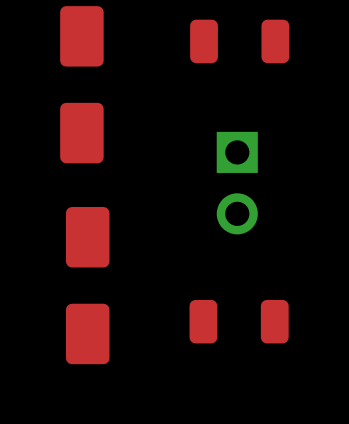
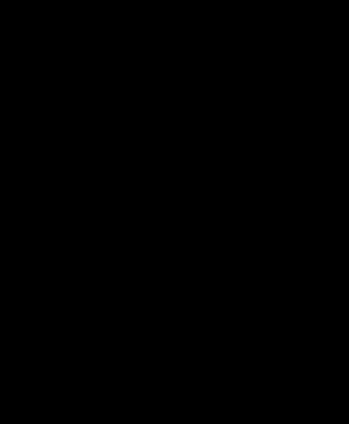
part: (239, 41) -> none
part: (81, 84) -> none
part: (237, 183) -> none
part: (87, 285) -> none
part: (239, 321) -> none

